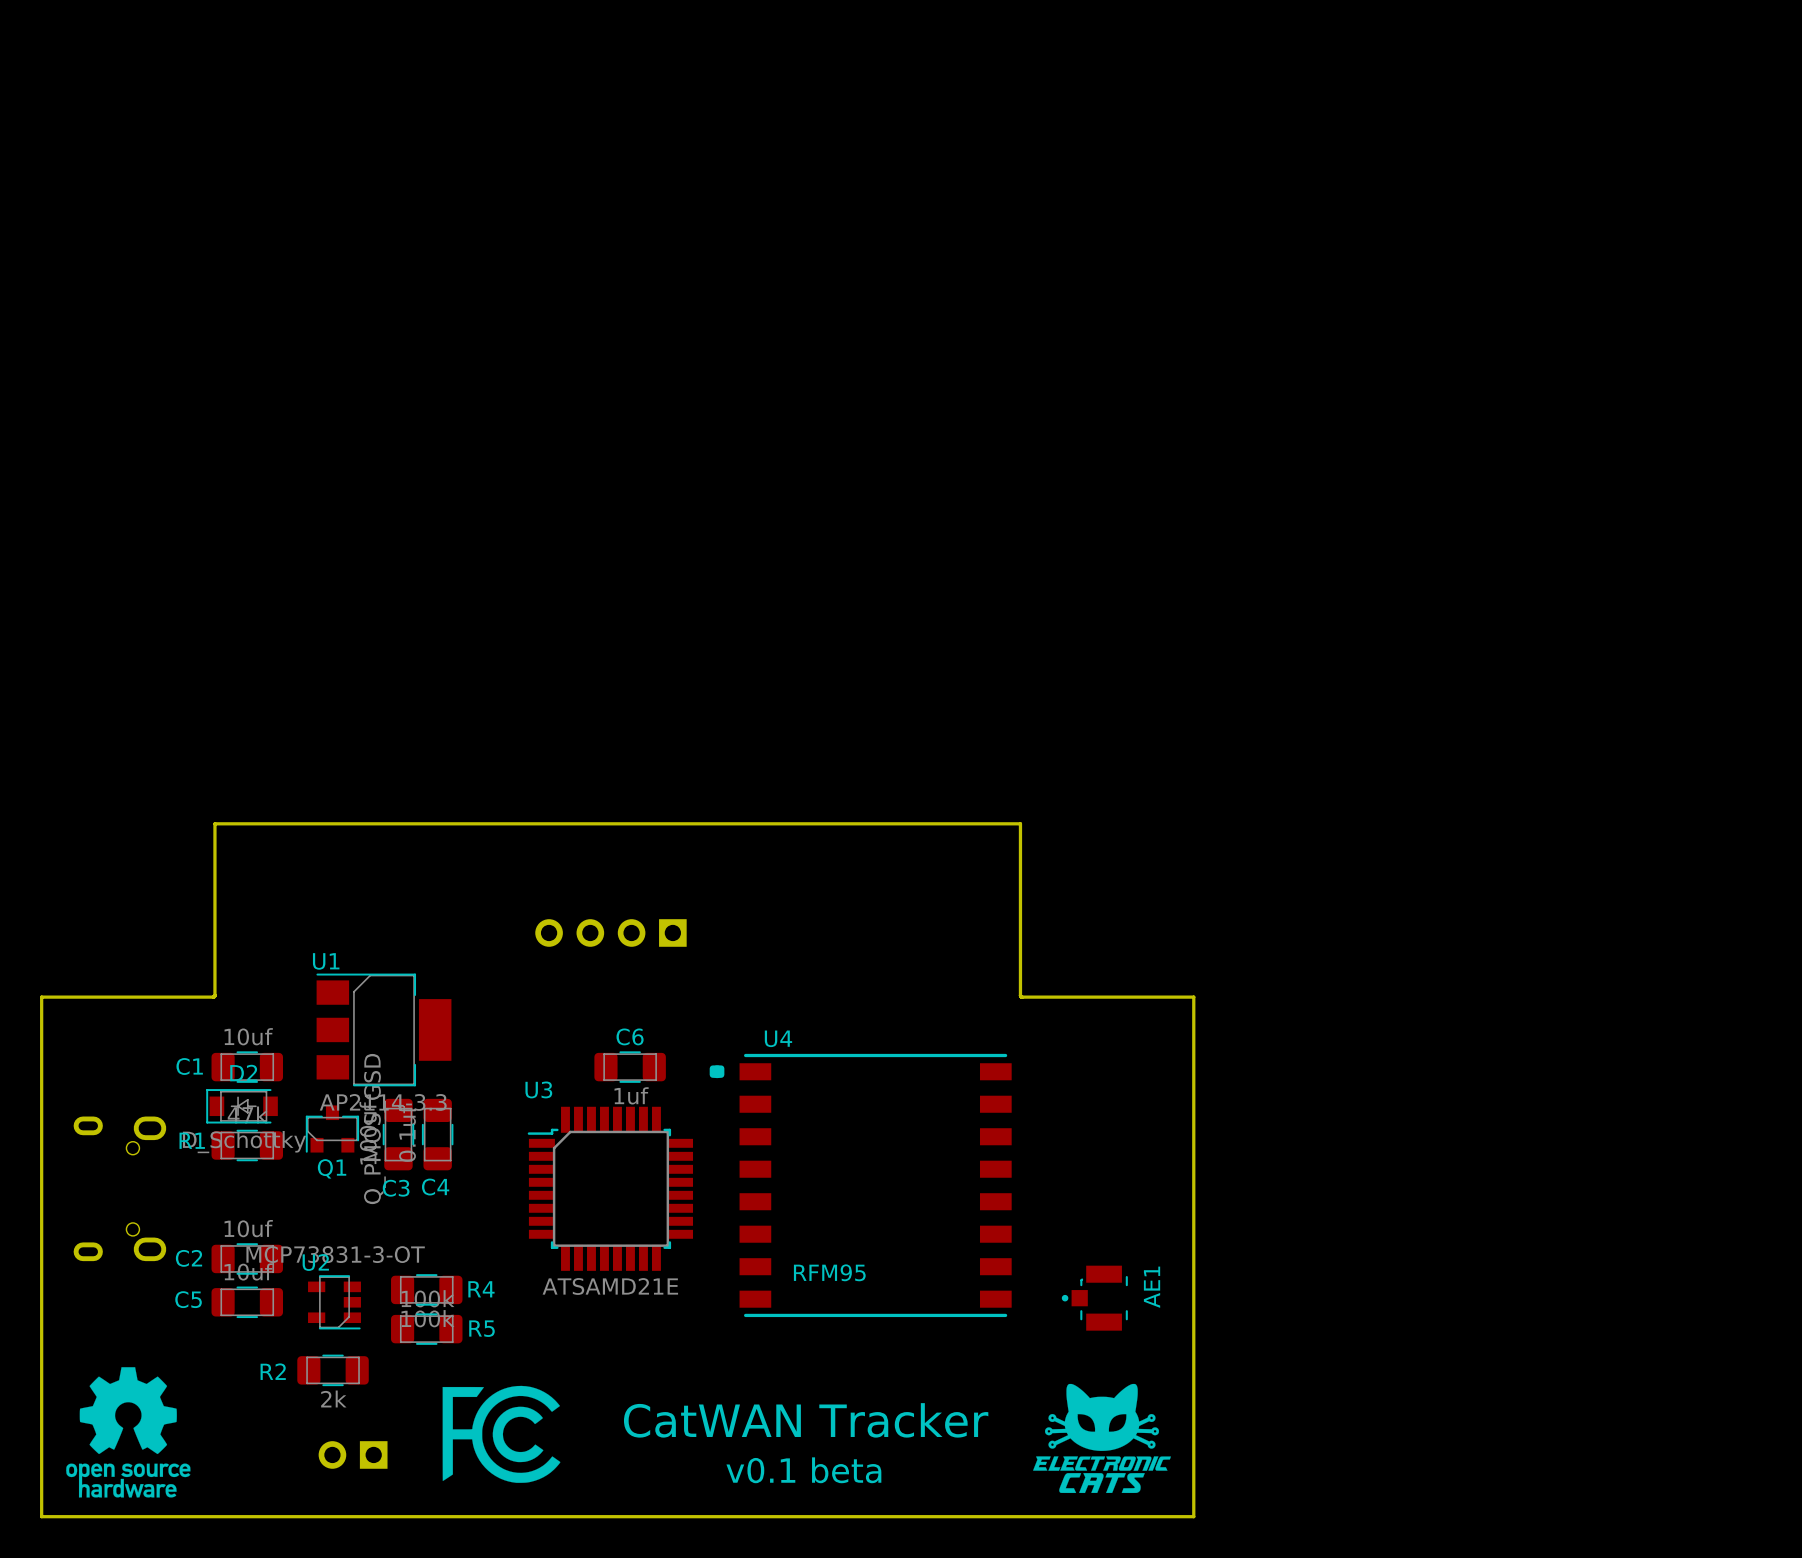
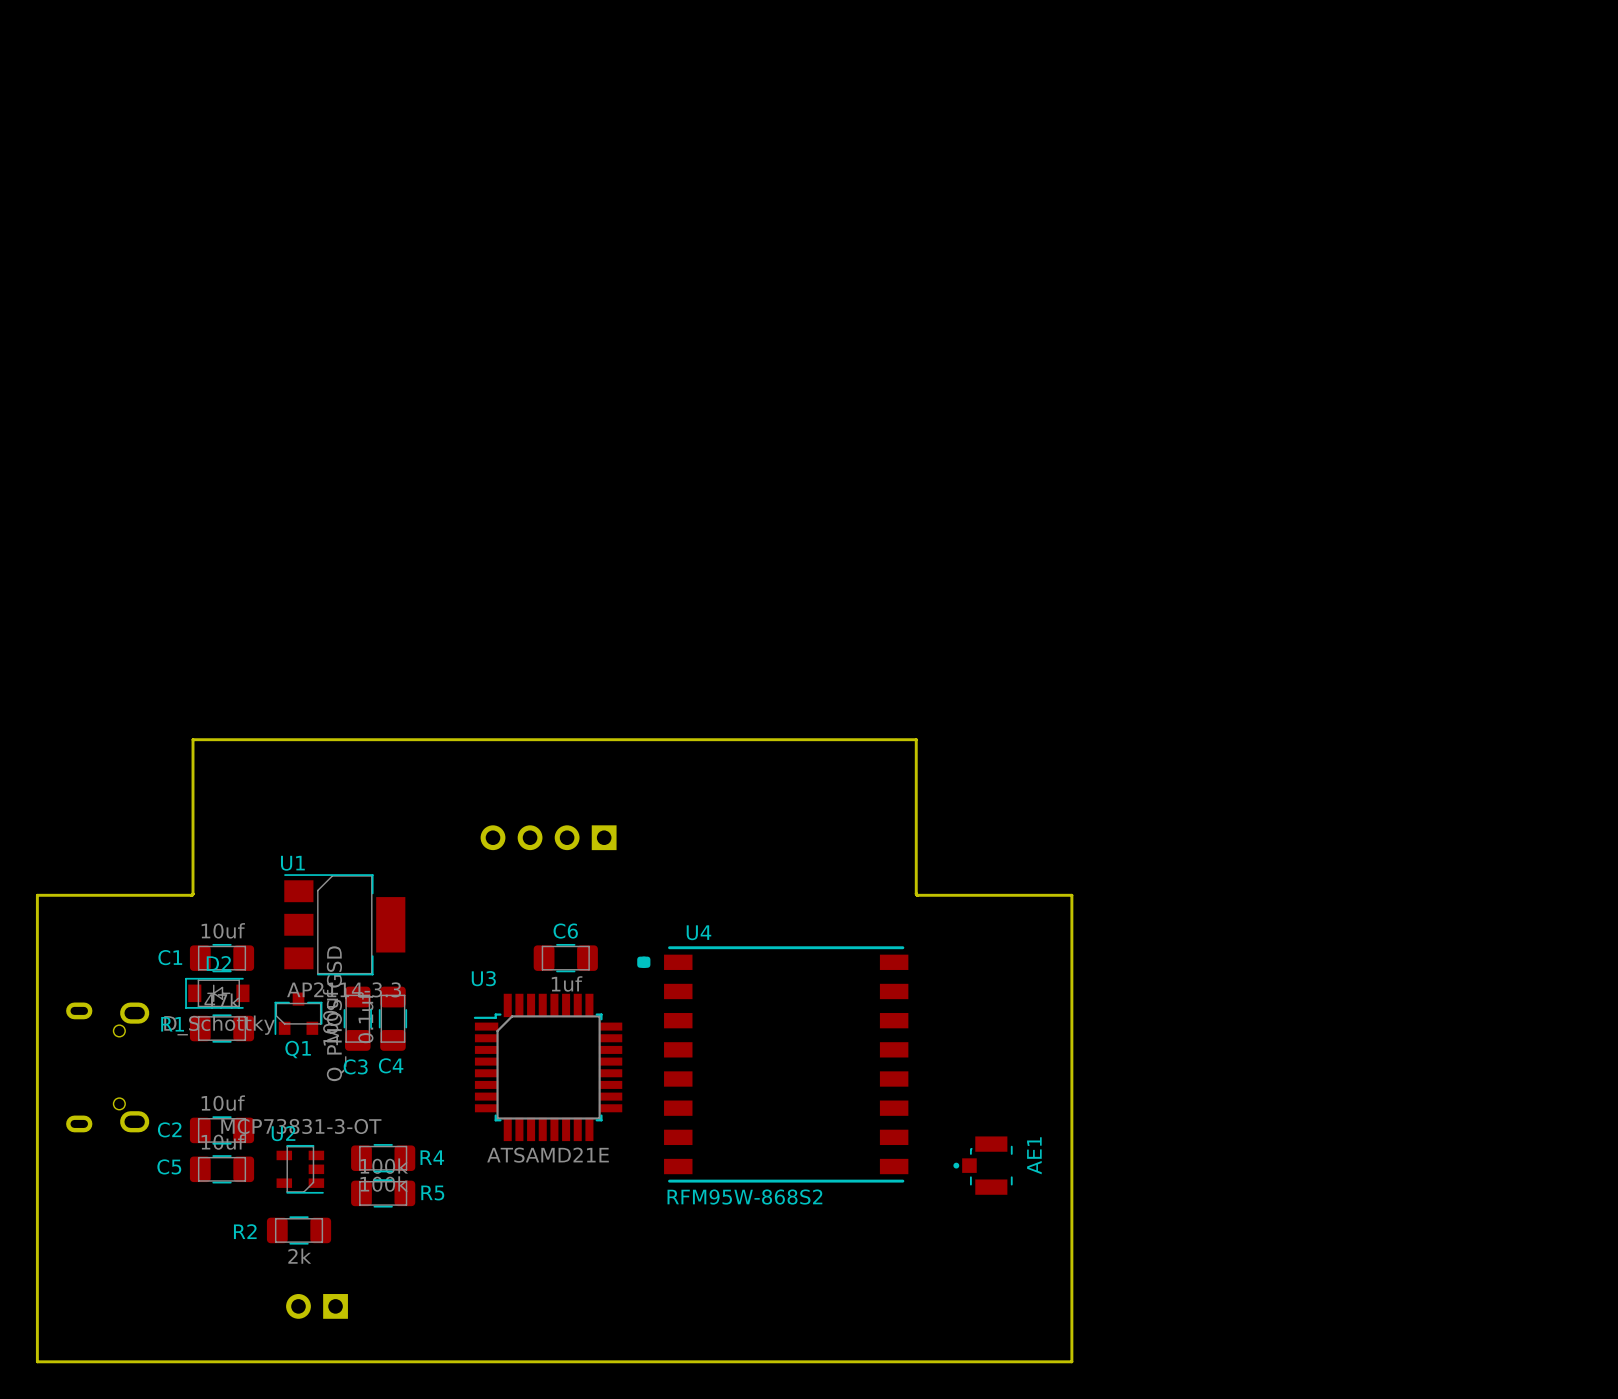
U4 value: RFM95 (829, 1272) -> RFM95W-868S2 (744, 1197)
drawing: [66, 1367, 191, 1498] -> none
drawing: [1033, 1383, 1171, 1494] -> none
drawing: [442, 1385, 561, 1483] -> none
text: CatWAN Tracker (806, 1420) -> none
text: v0.1 beta (803, 1470) -> none

